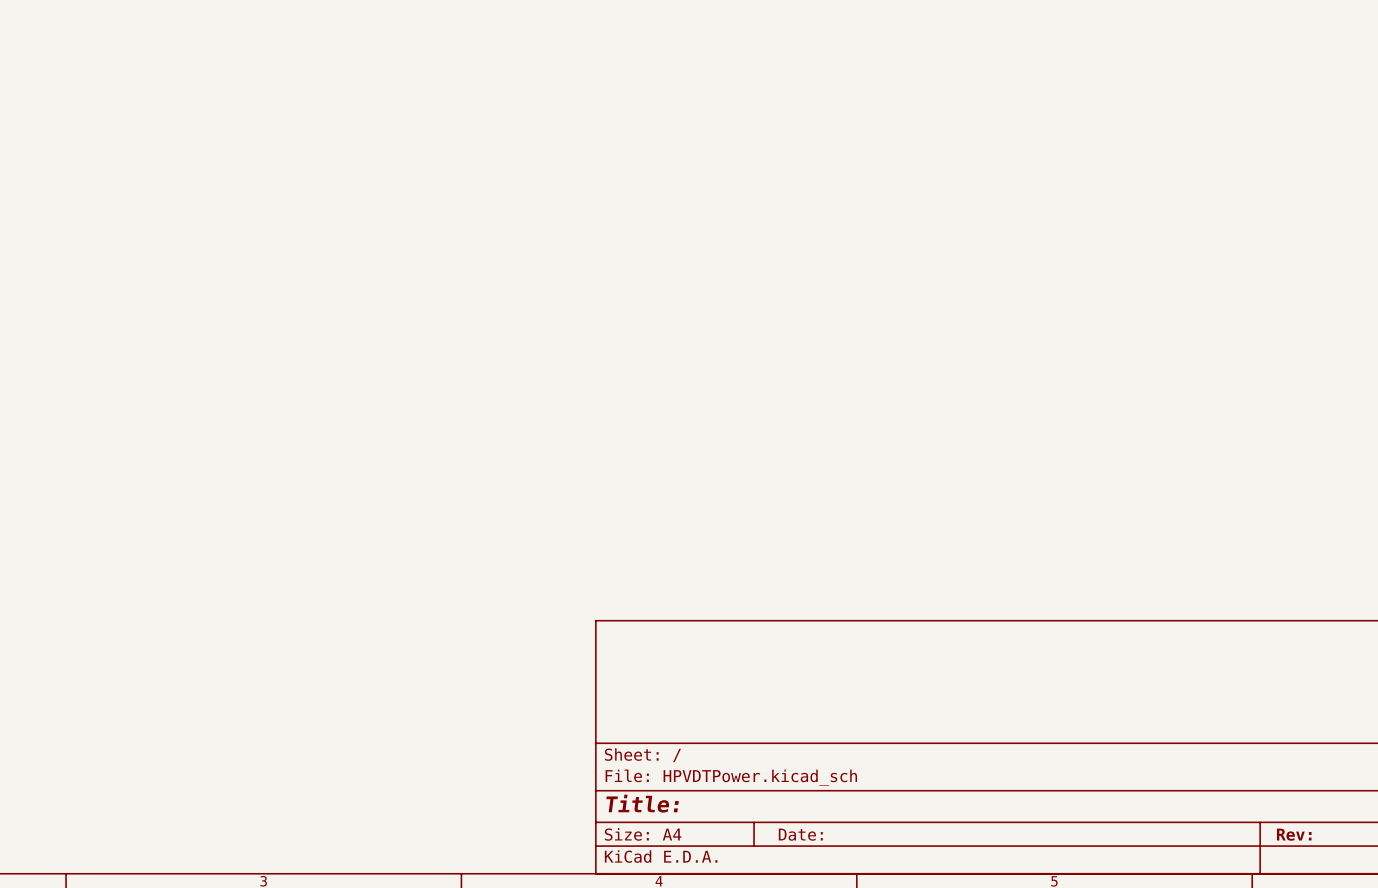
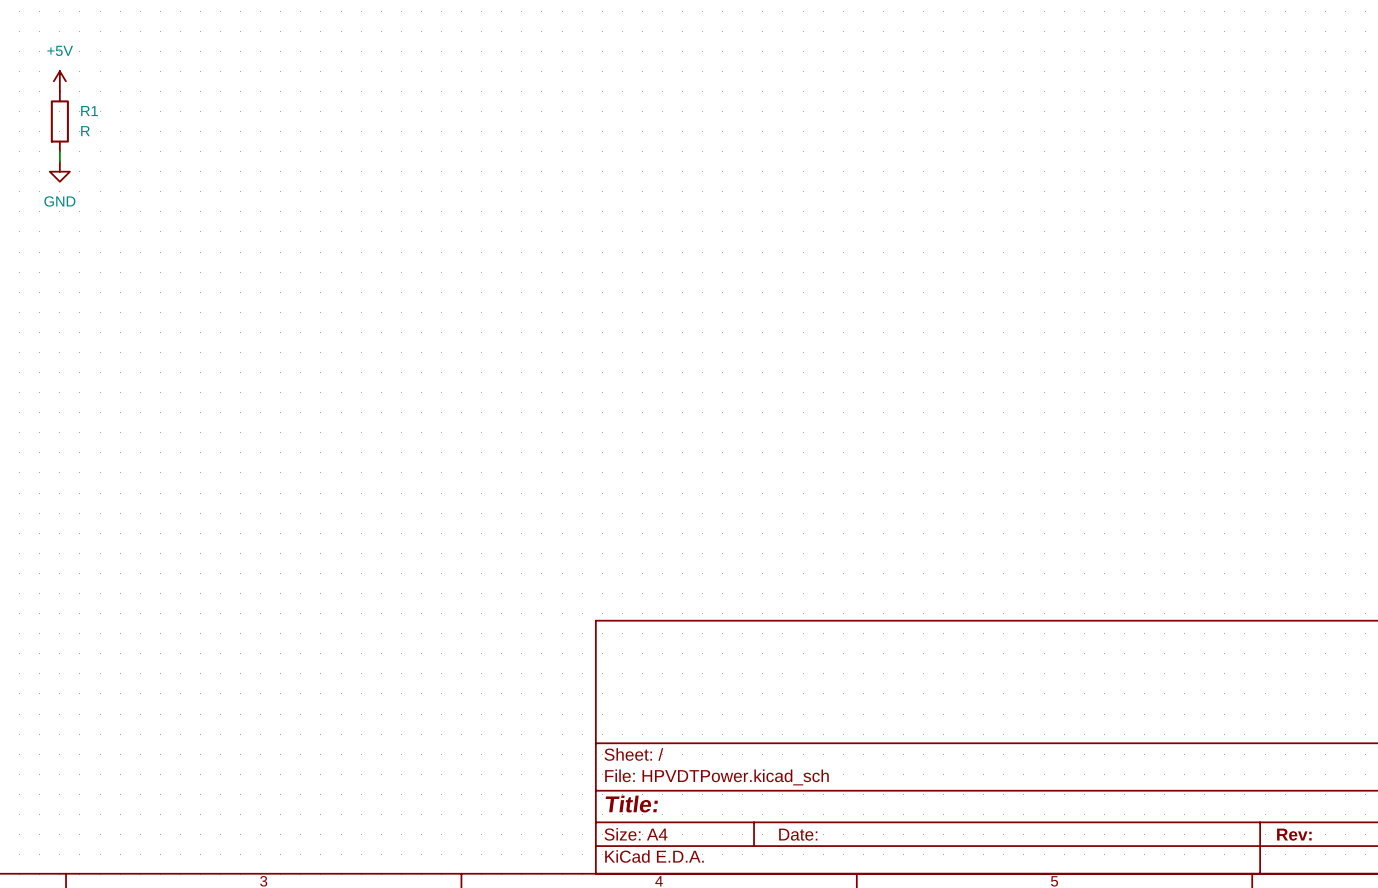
power symbol: none -> +5V (59, 81)
R1: none -> R (59, 121)
wire: none -> (59, 151) (59, 161)
power symbol: none -> GND (59, 171)

